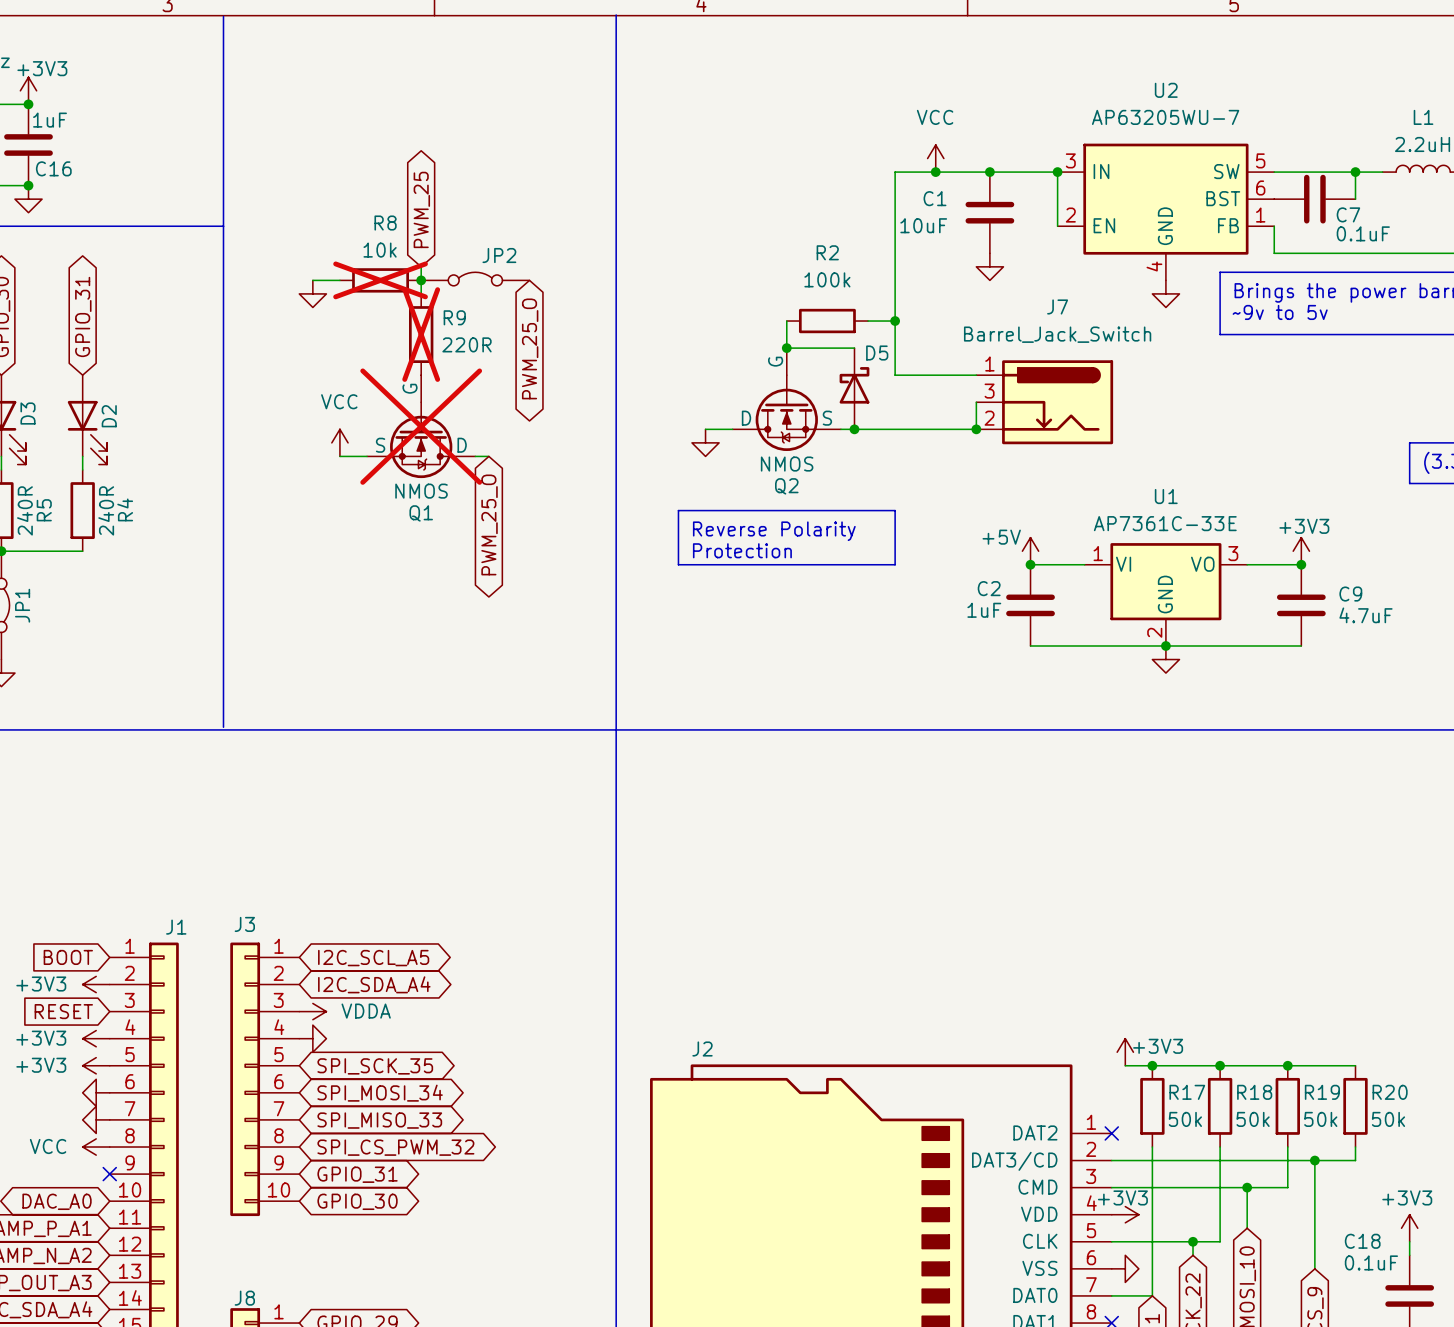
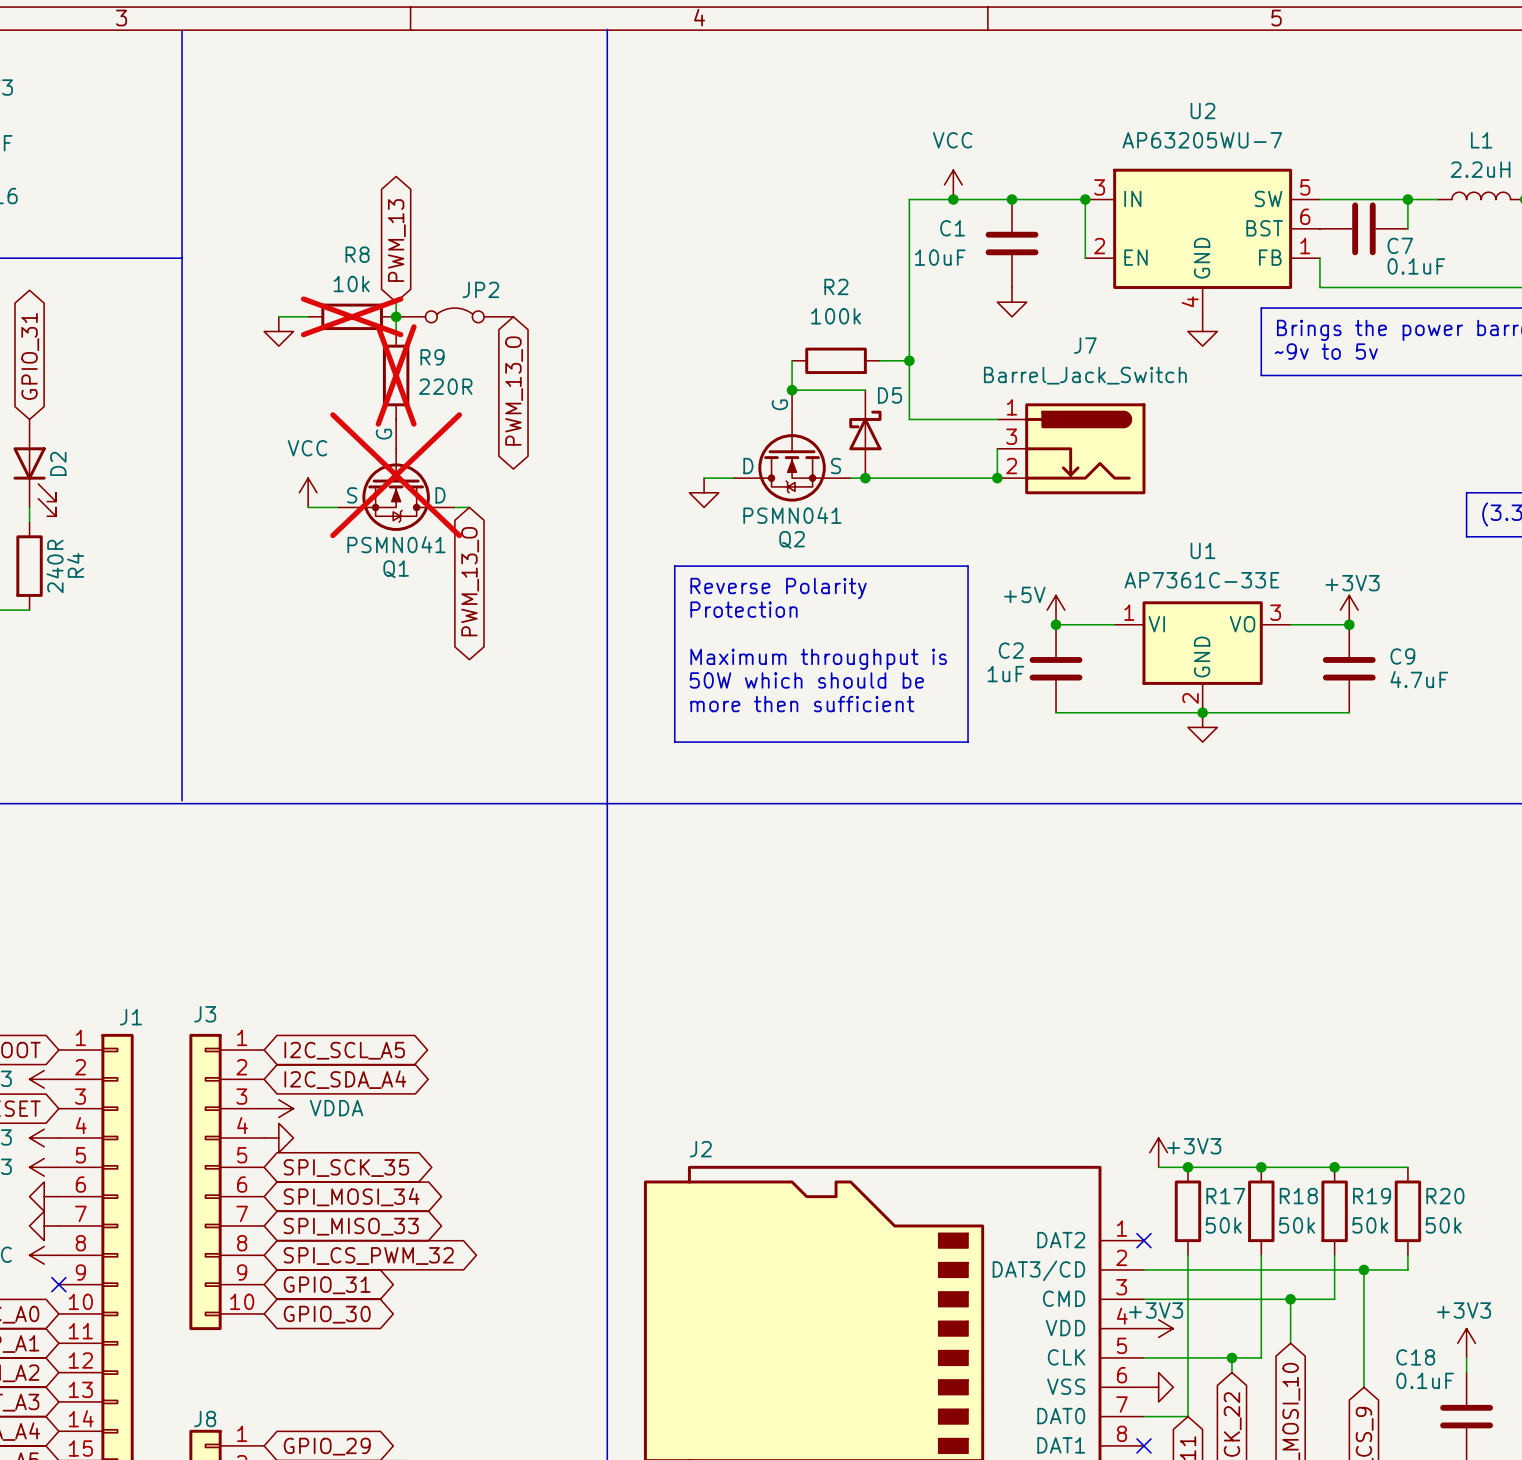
global label: PWM_25 (421, 209) -> PWM_13 (396, 240)
global label: PWM_25_O (530, 348) -> PWM_13_O (514, 391)
Q2 value: NMOS (787, 464) -> PSMN041 (792, 515)
Q1 value: NMOS (421, 491) -> PSMN041 (396, 544)
line: (895, 510) (895, 564) (678, 564) -> (909, 566) (968, 566) (968, 742) (674, 742) (674, 624)
global label: PWM_25_O (489, 524) -> PWM_13_O (470, 581)
text: none -> Maximum throughput is (818, 659)
text: none -> 50W which should be (806, 680)
text: none -> more then sufficient (802, 704)

